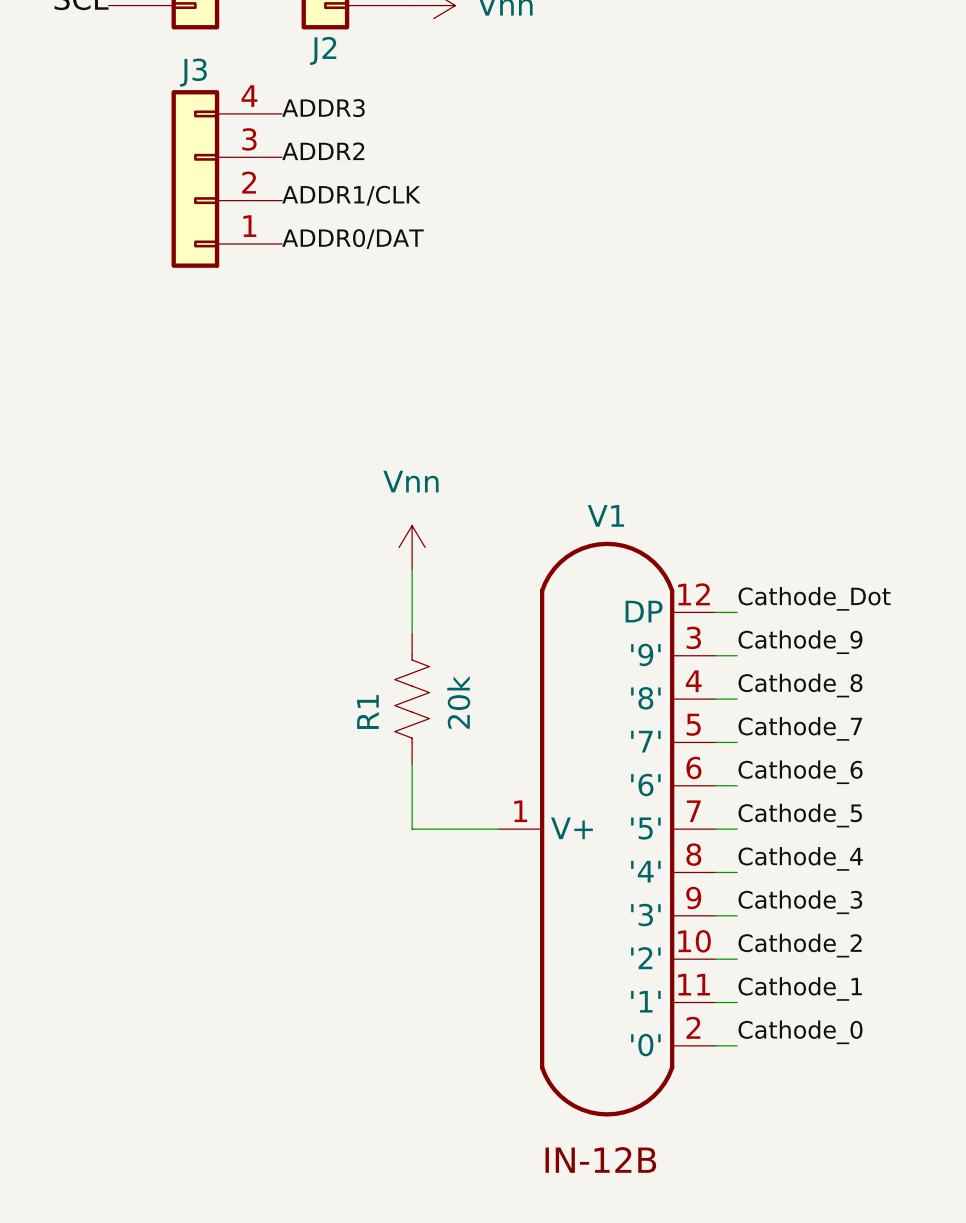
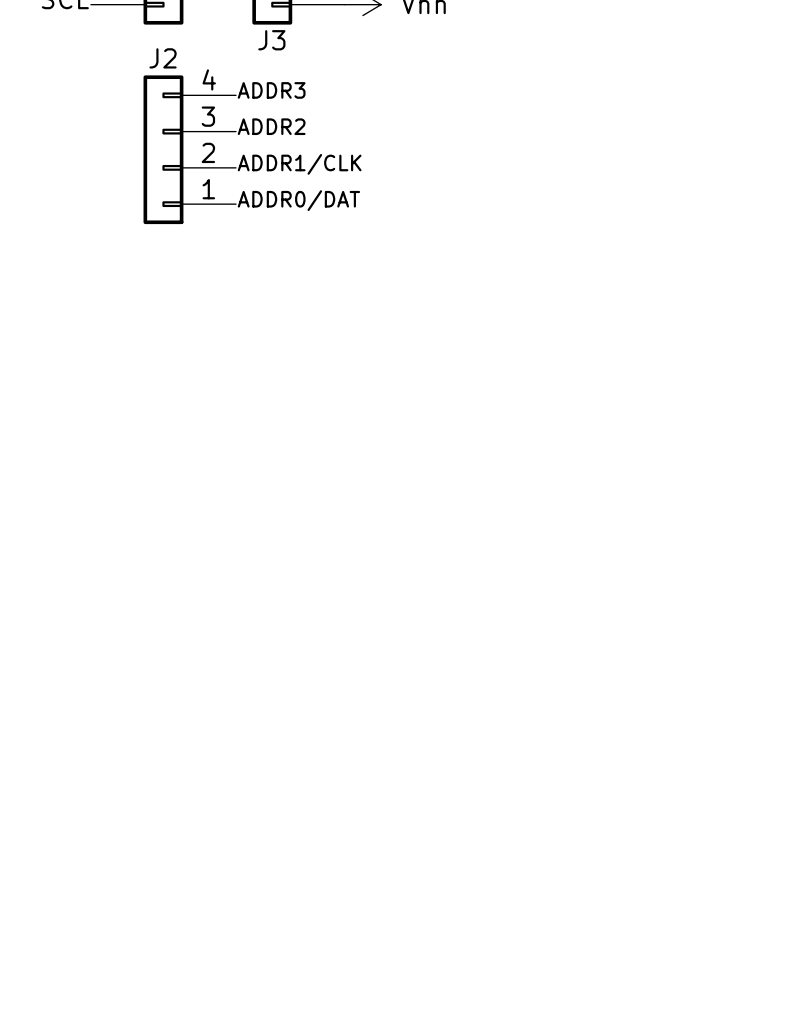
J2 name: J2 (323, 50) -> J3 (271, 40)
J3 name: J3 (193, 72) -> J2 (163, 58)
power symbol: Vnn (412, 547) -> none
wire: (412, 569) (412, 634) -> none
label: Cathode_Dot (814, 598) -> none
wire: (715, 612) (737, 612) -> none
label: Cathode_9 (800, 642) -> none
wire: (715, 655) (737, 655) -> none
label: Cathode_8 (800, 685) -> none
R1: 20k (412, 699) -> none
wire: (715, 699) (737, 699) -> none
label: Cathode_7 (800, 728) -> none
wire: (715, 742) (737, 742) -> none
wire: (412, 764) (412, 829) (498, 829) -> none
label: Cathode_6 (800, 772) -> none
wire: (715, 785) (737, 785) -> none
label: Cathode_5 (800, 815) -> none
V1: (607, 829) -> none
wire: (715, 829) (737, 829) -> none
label: Cathode_4 (800, 858) -> none
wire: (715, 872) (737, 872) -> none
label: Cathode_3 (800, 902) -> none
wire: (715, 915) (737, 915) -> none
label: Cathode_2 (800, 945) -> none
wire: (715, 959) (737, 959) -> none
label: Cathode_1 (800, 988) -> none
wire: (715, 1002) (737, 1002) -> none
label: Cathode_0 (800, 1032) -> none
wire: (715, 1045) (737, 1045) -> none

